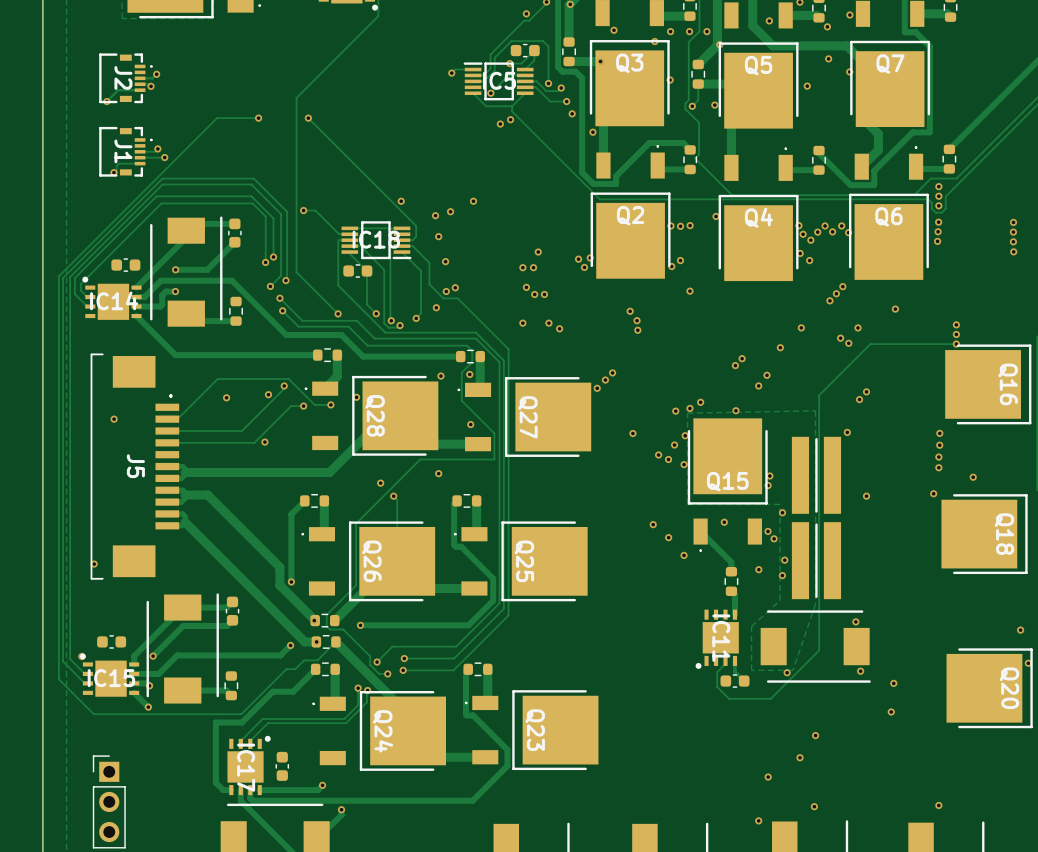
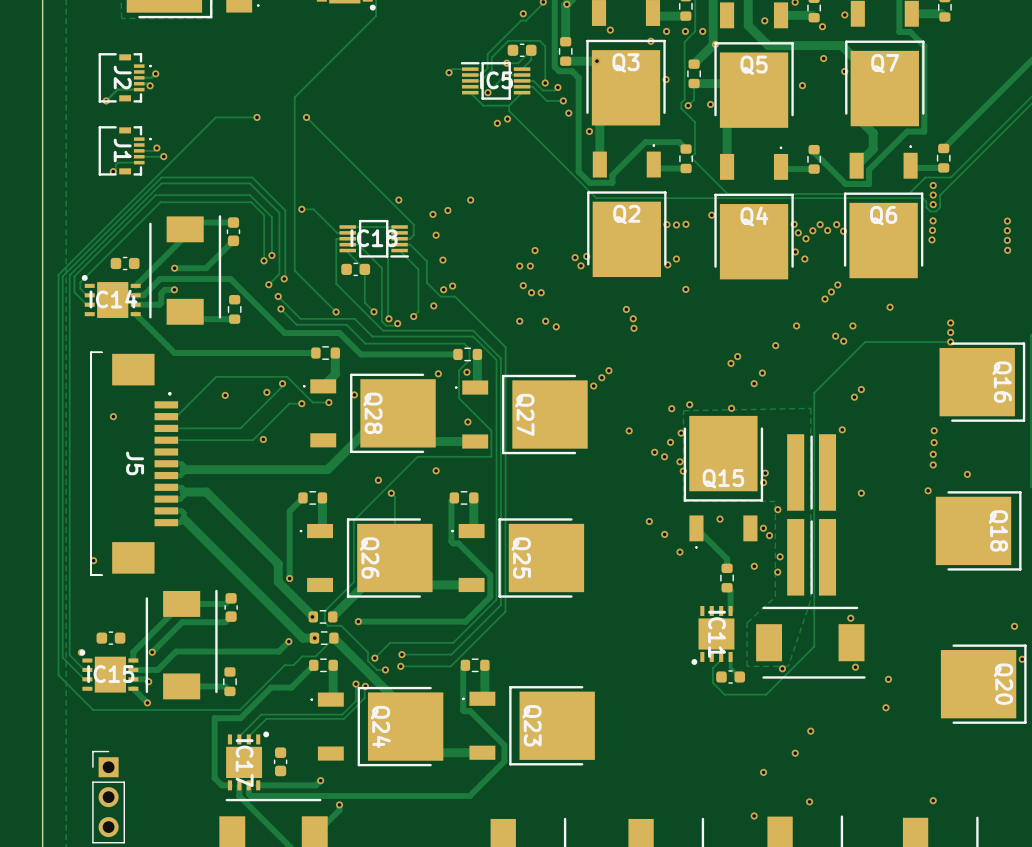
via: (700, 402) -> none
via: none -> (689, 404)
via: (689, 408) -> none
via: none -> (683, 471)

